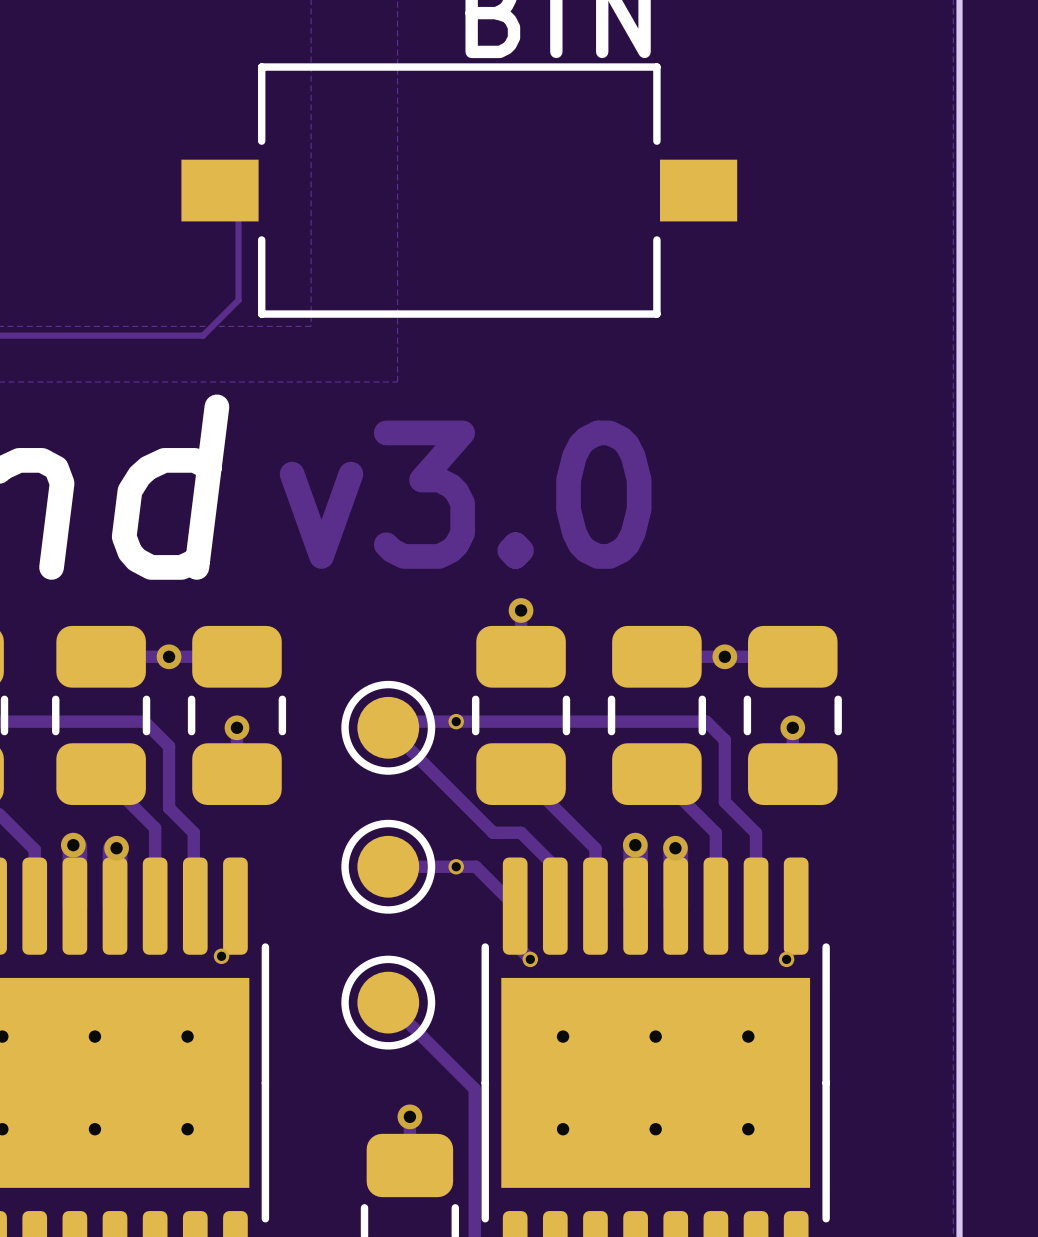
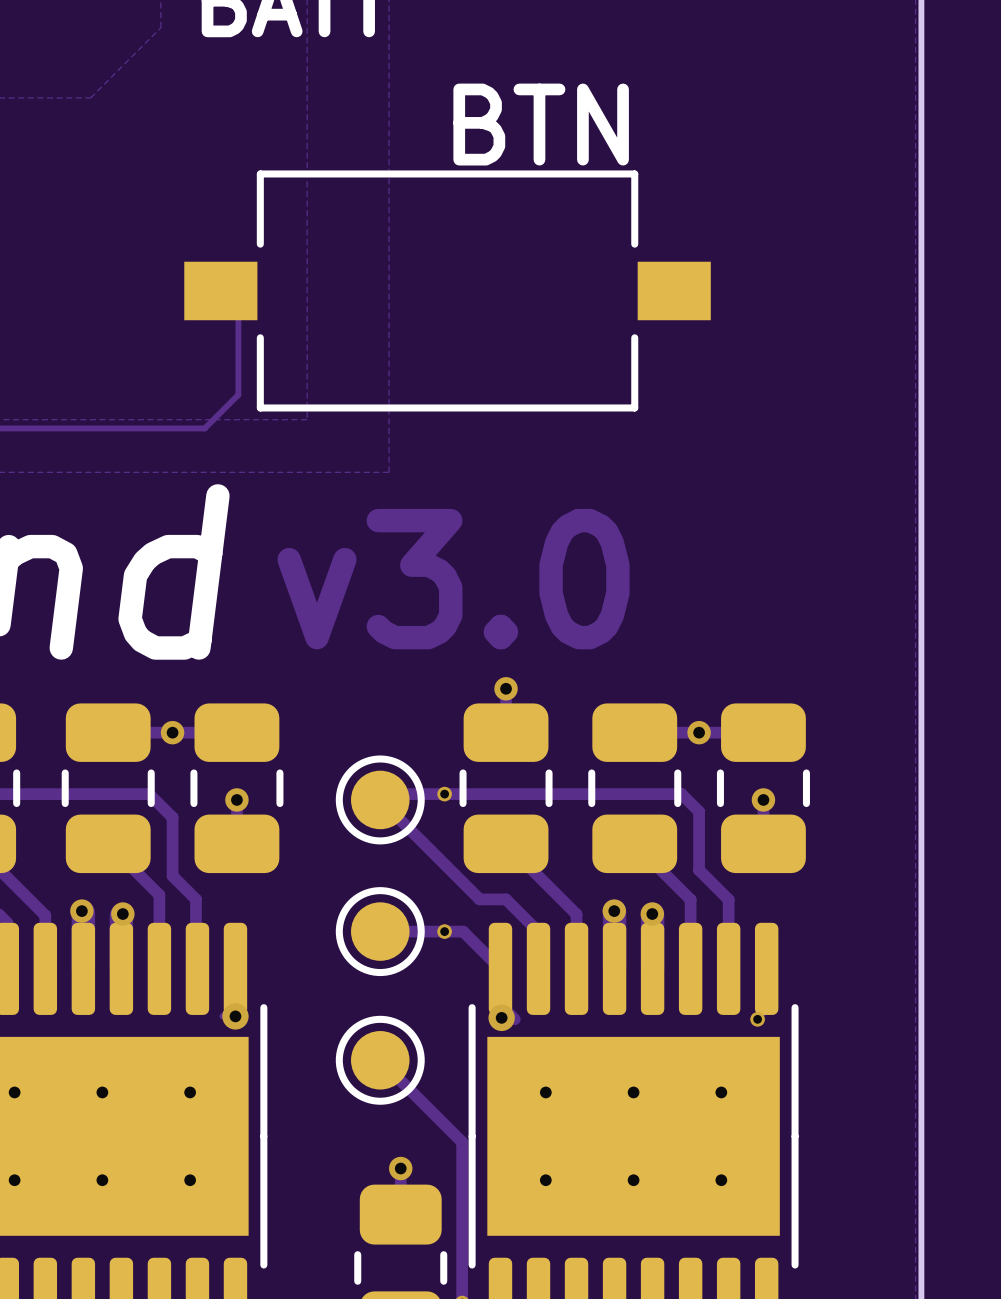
via size: [213, 948, 230, 965] -> [222, 1003, 249, 1030]
via size: [522, 951, 539, 968] -> [488, 1004, 515, 1032]

